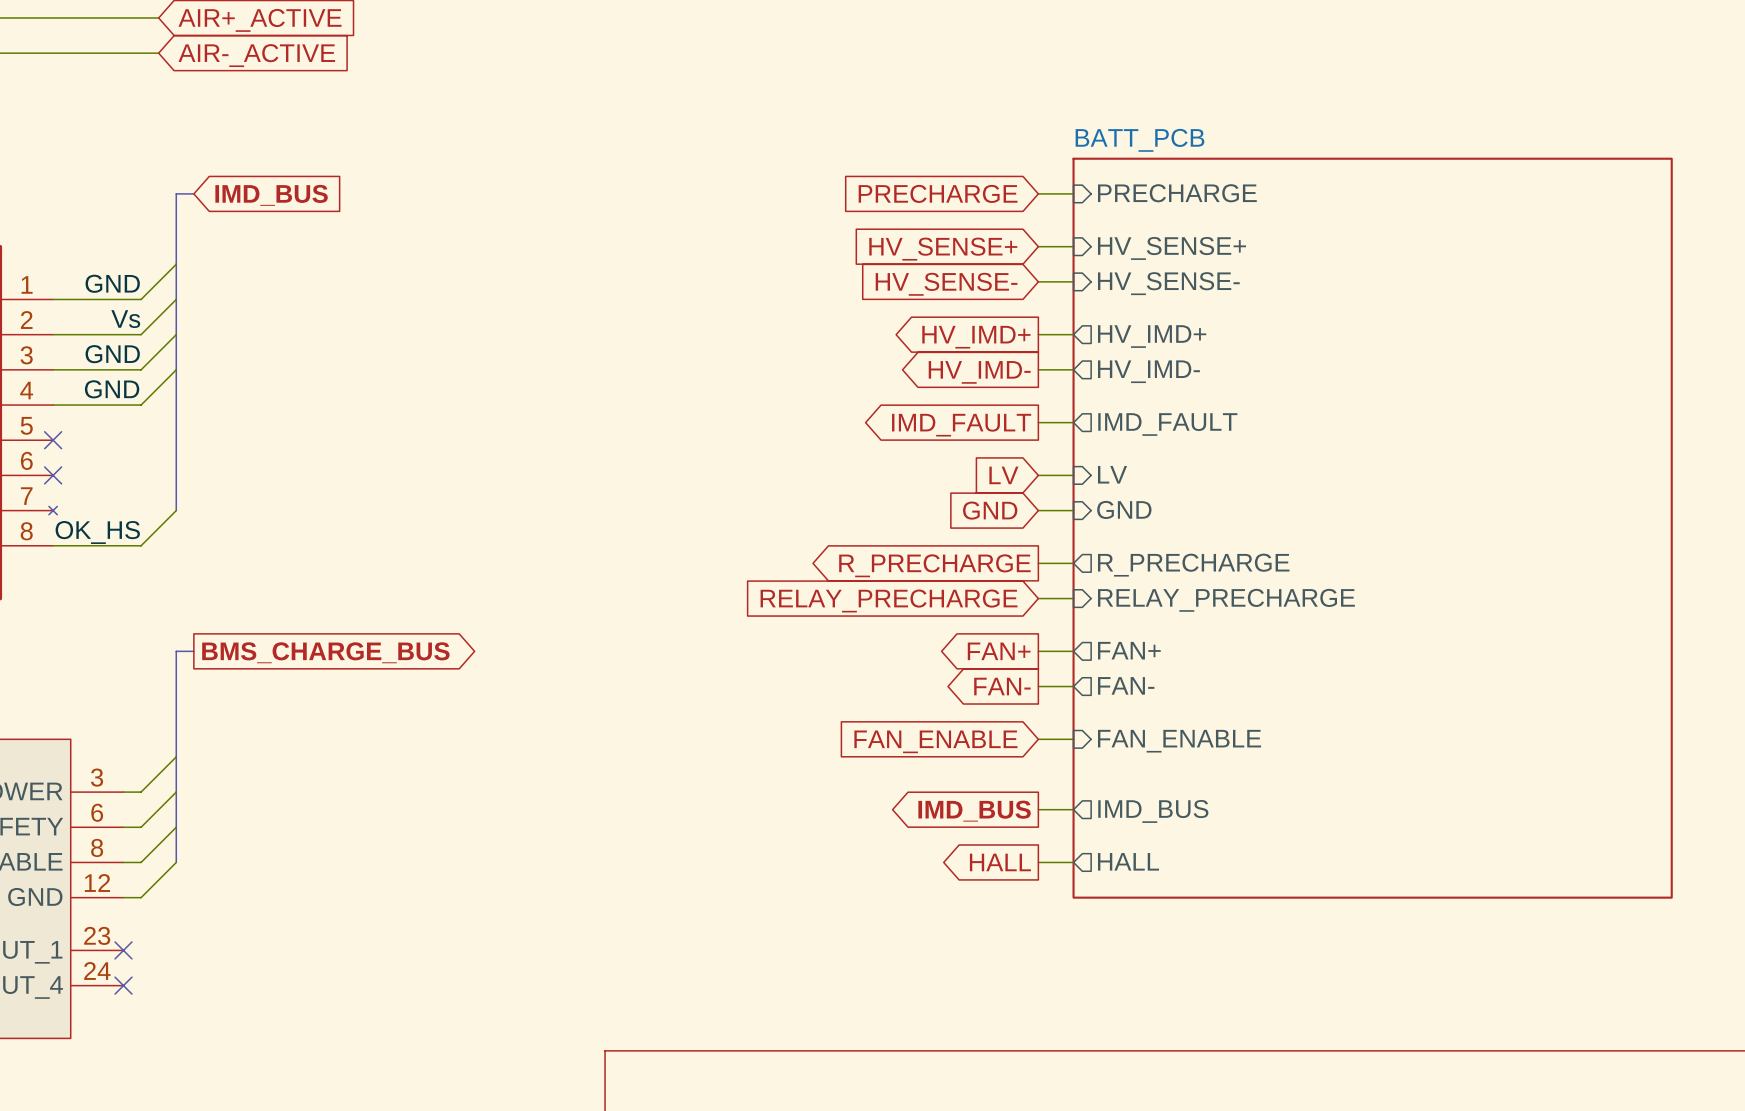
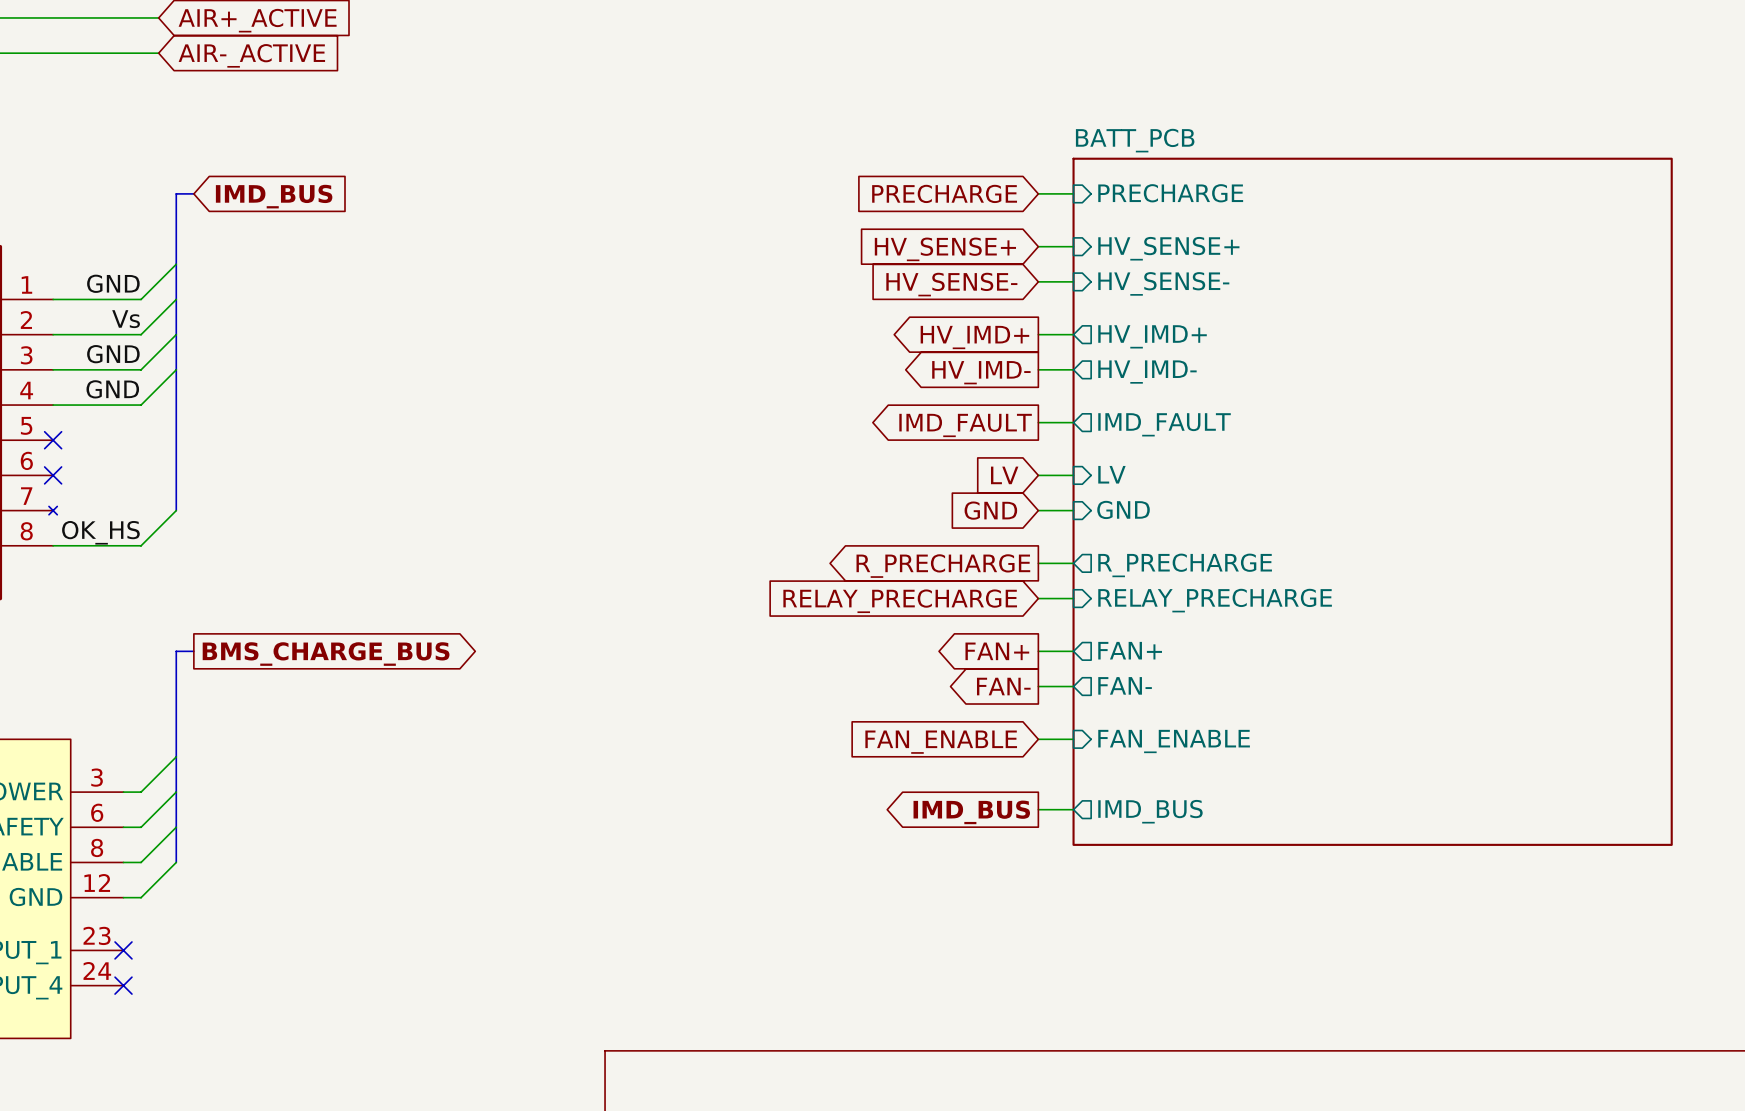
sheet BATT_PCB: none -> (1372, 501)
sheet BATT_PCB: (1372, 528) -> none
sheet pin: HALL (1128, 861) -> none
global label: HALL (1000, 862) -> none
wire: (1038, 862) (1073, 862) -> none

